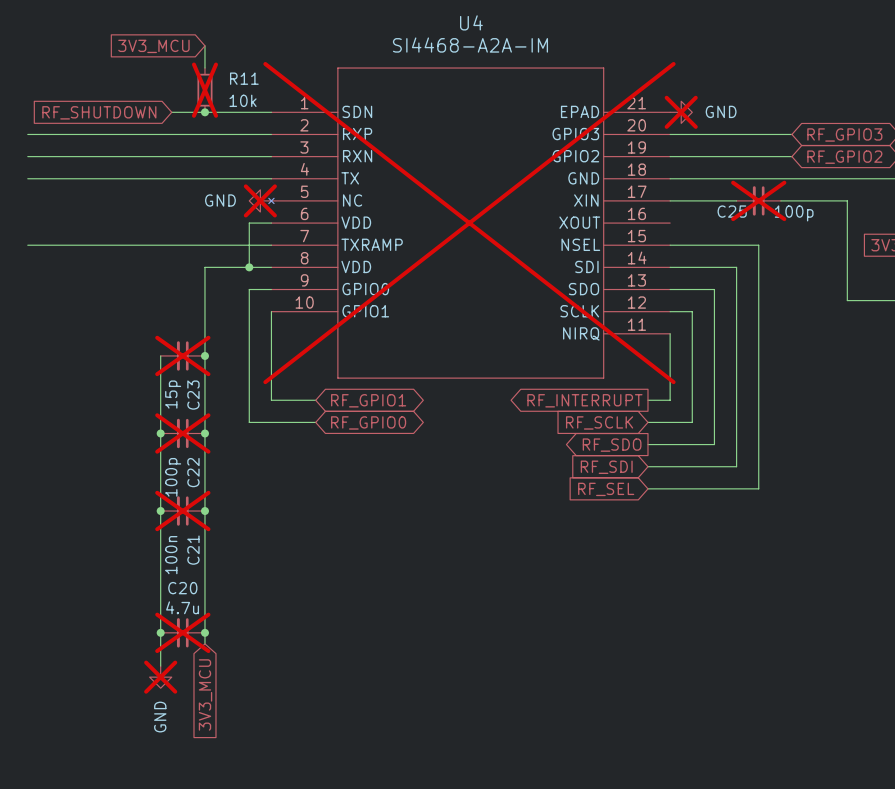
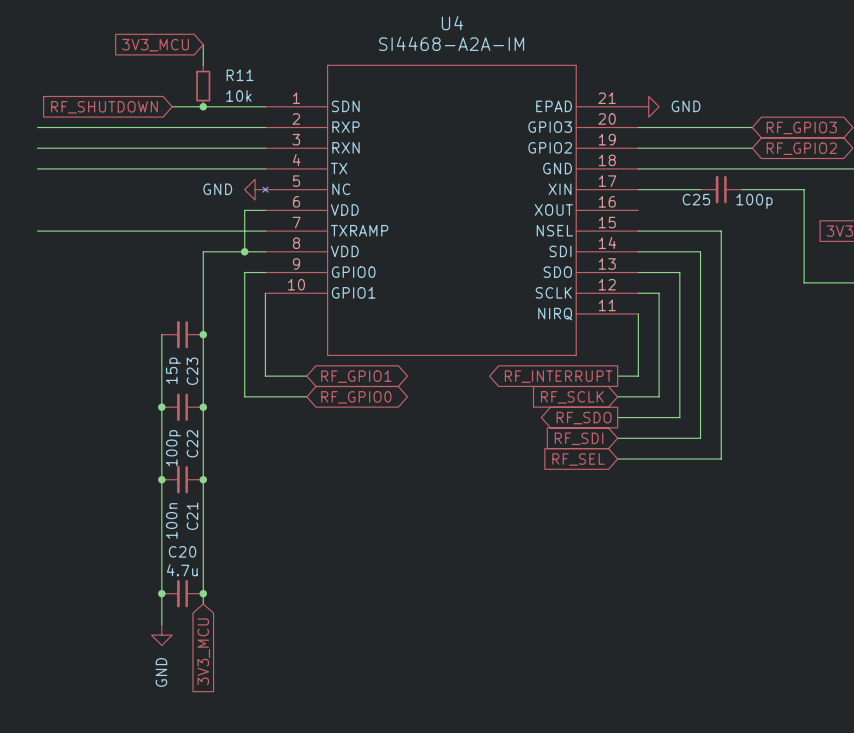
R11 do-not-place cross: (204, 90) -> none
power symbol do-not-place cross: (681, 112) -> none
power symbol do-not-place cross: (260, 200) -> none
C25 do-not-place cross: (758, 200) -> none
U4 do-not-place cross: (469, 223) -> none
C23 do-not-place cross: (182, 355) -> none
C22 do-not-place cross: (182, 433) -> none
C21 do-not-place cross: (182, 511) -> none
C20 do-not-place cross: (182, 632) -> none
power symbol do-not-place cross: (160, 677) -> none

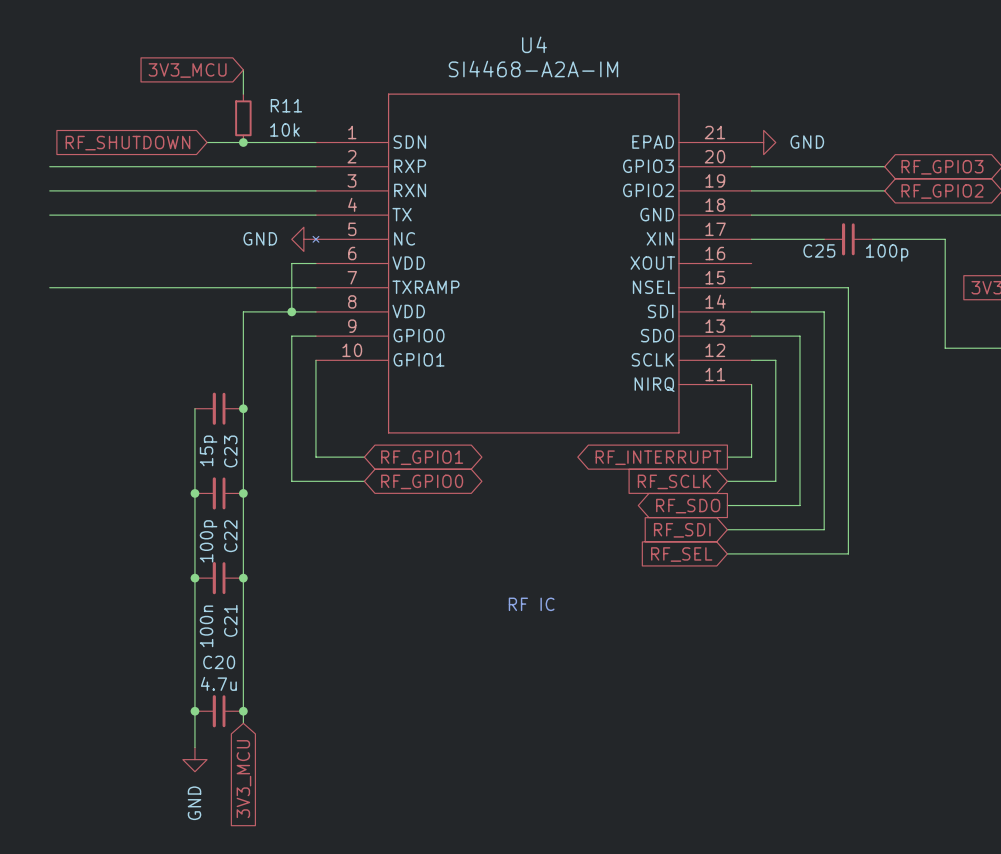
text: none -> RF IC (531, 604)

